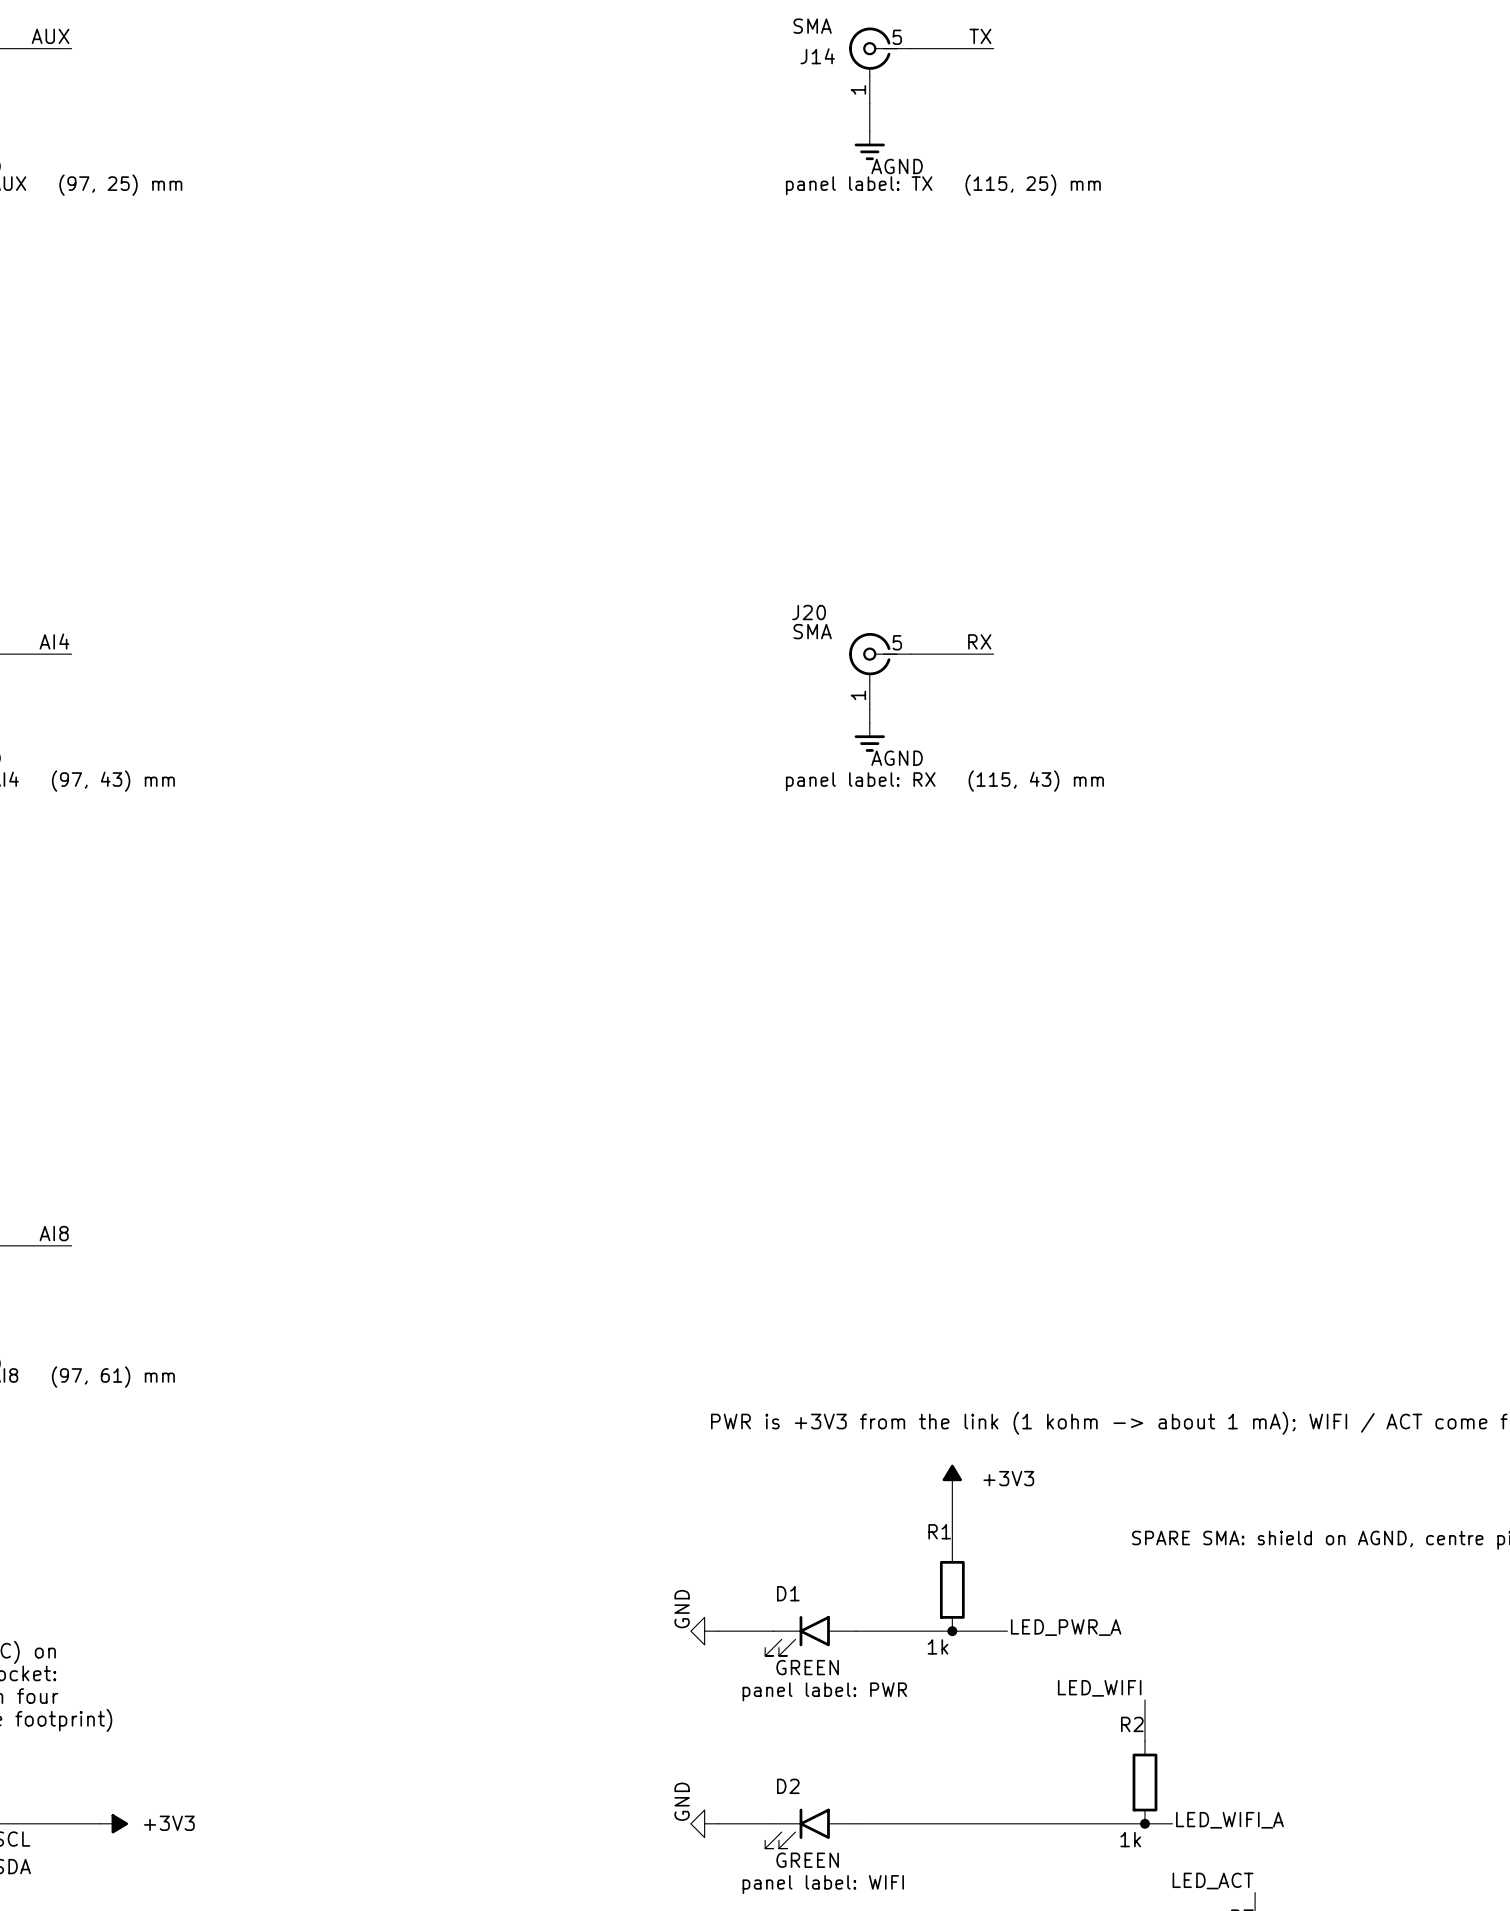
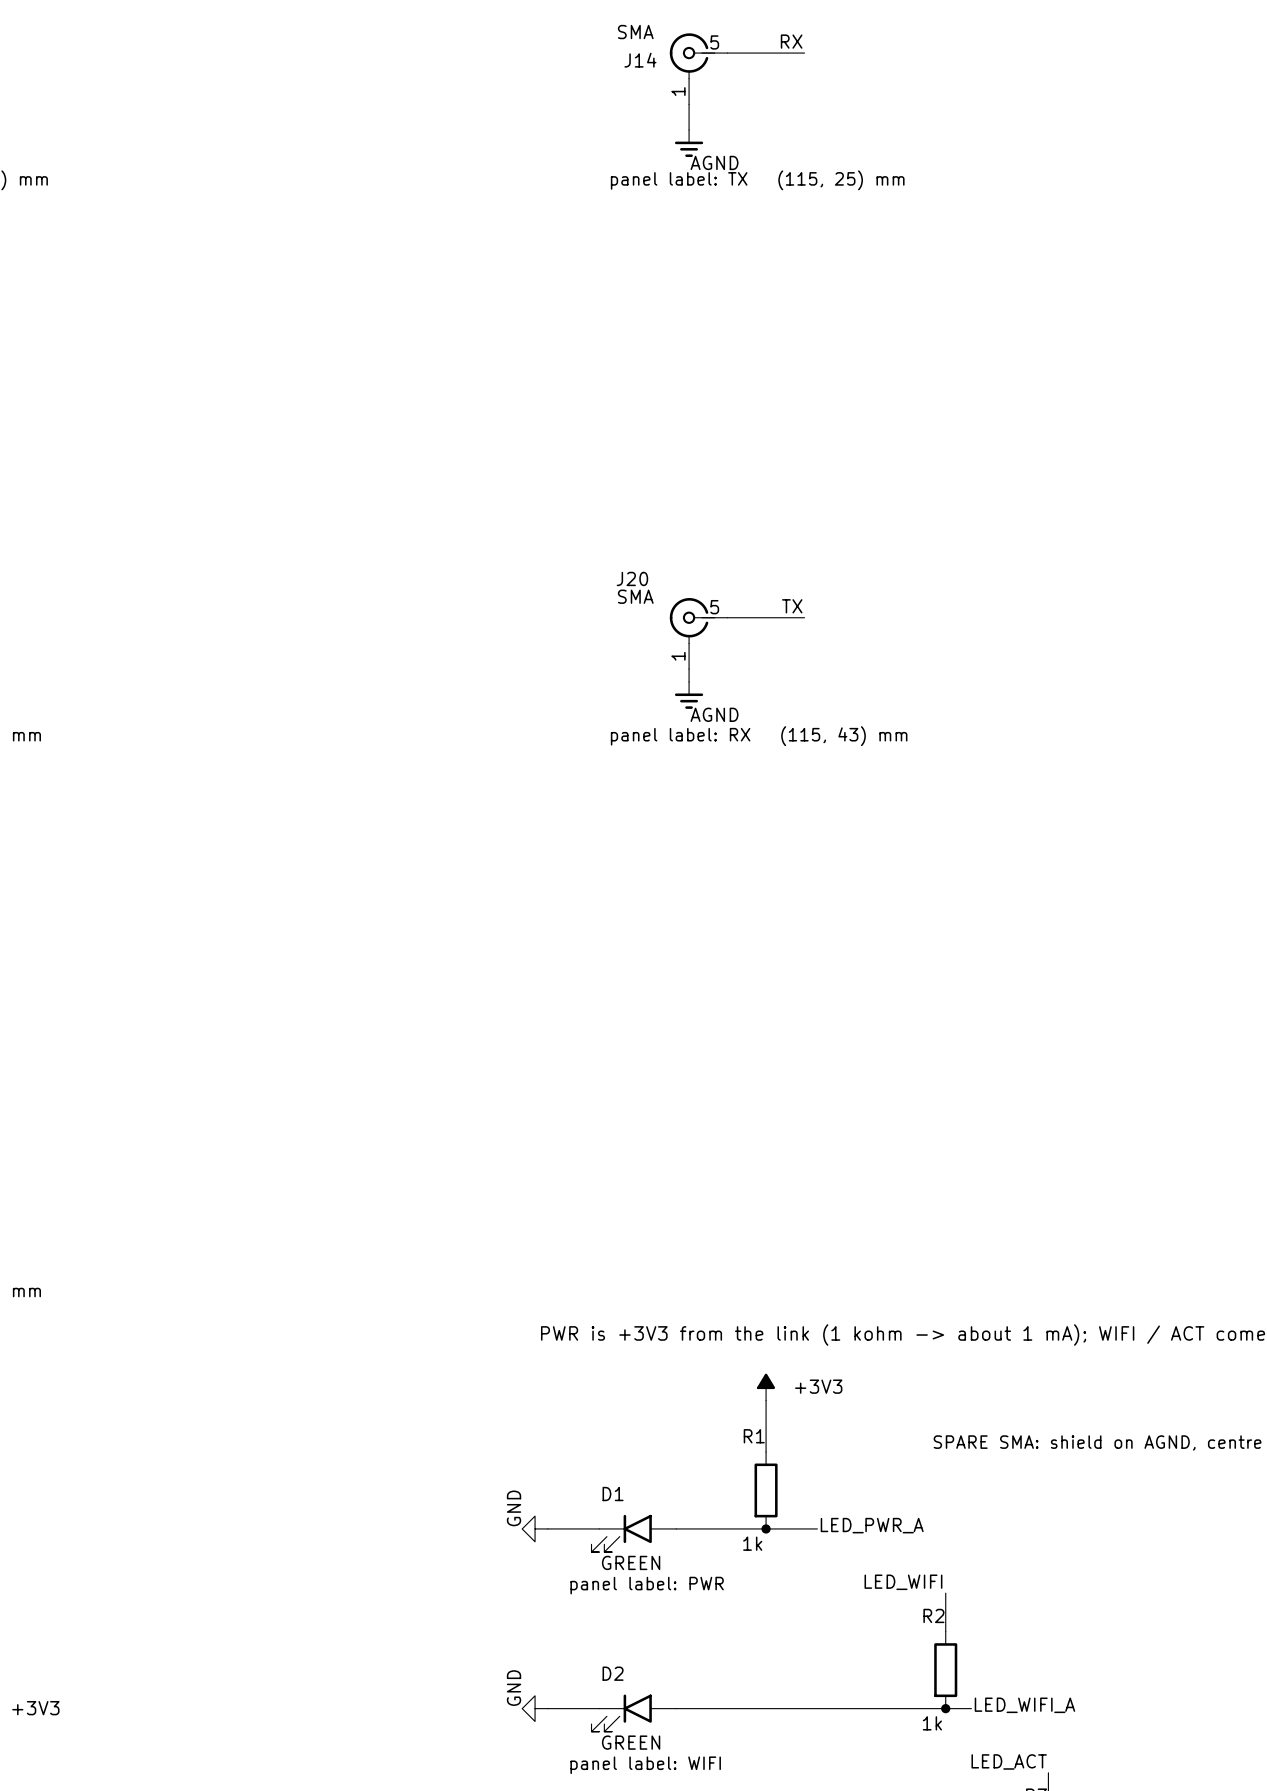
label: TX (980, 36) -> RX (791, 41)
label: RX (979, 641) -> TX (792, 606)

